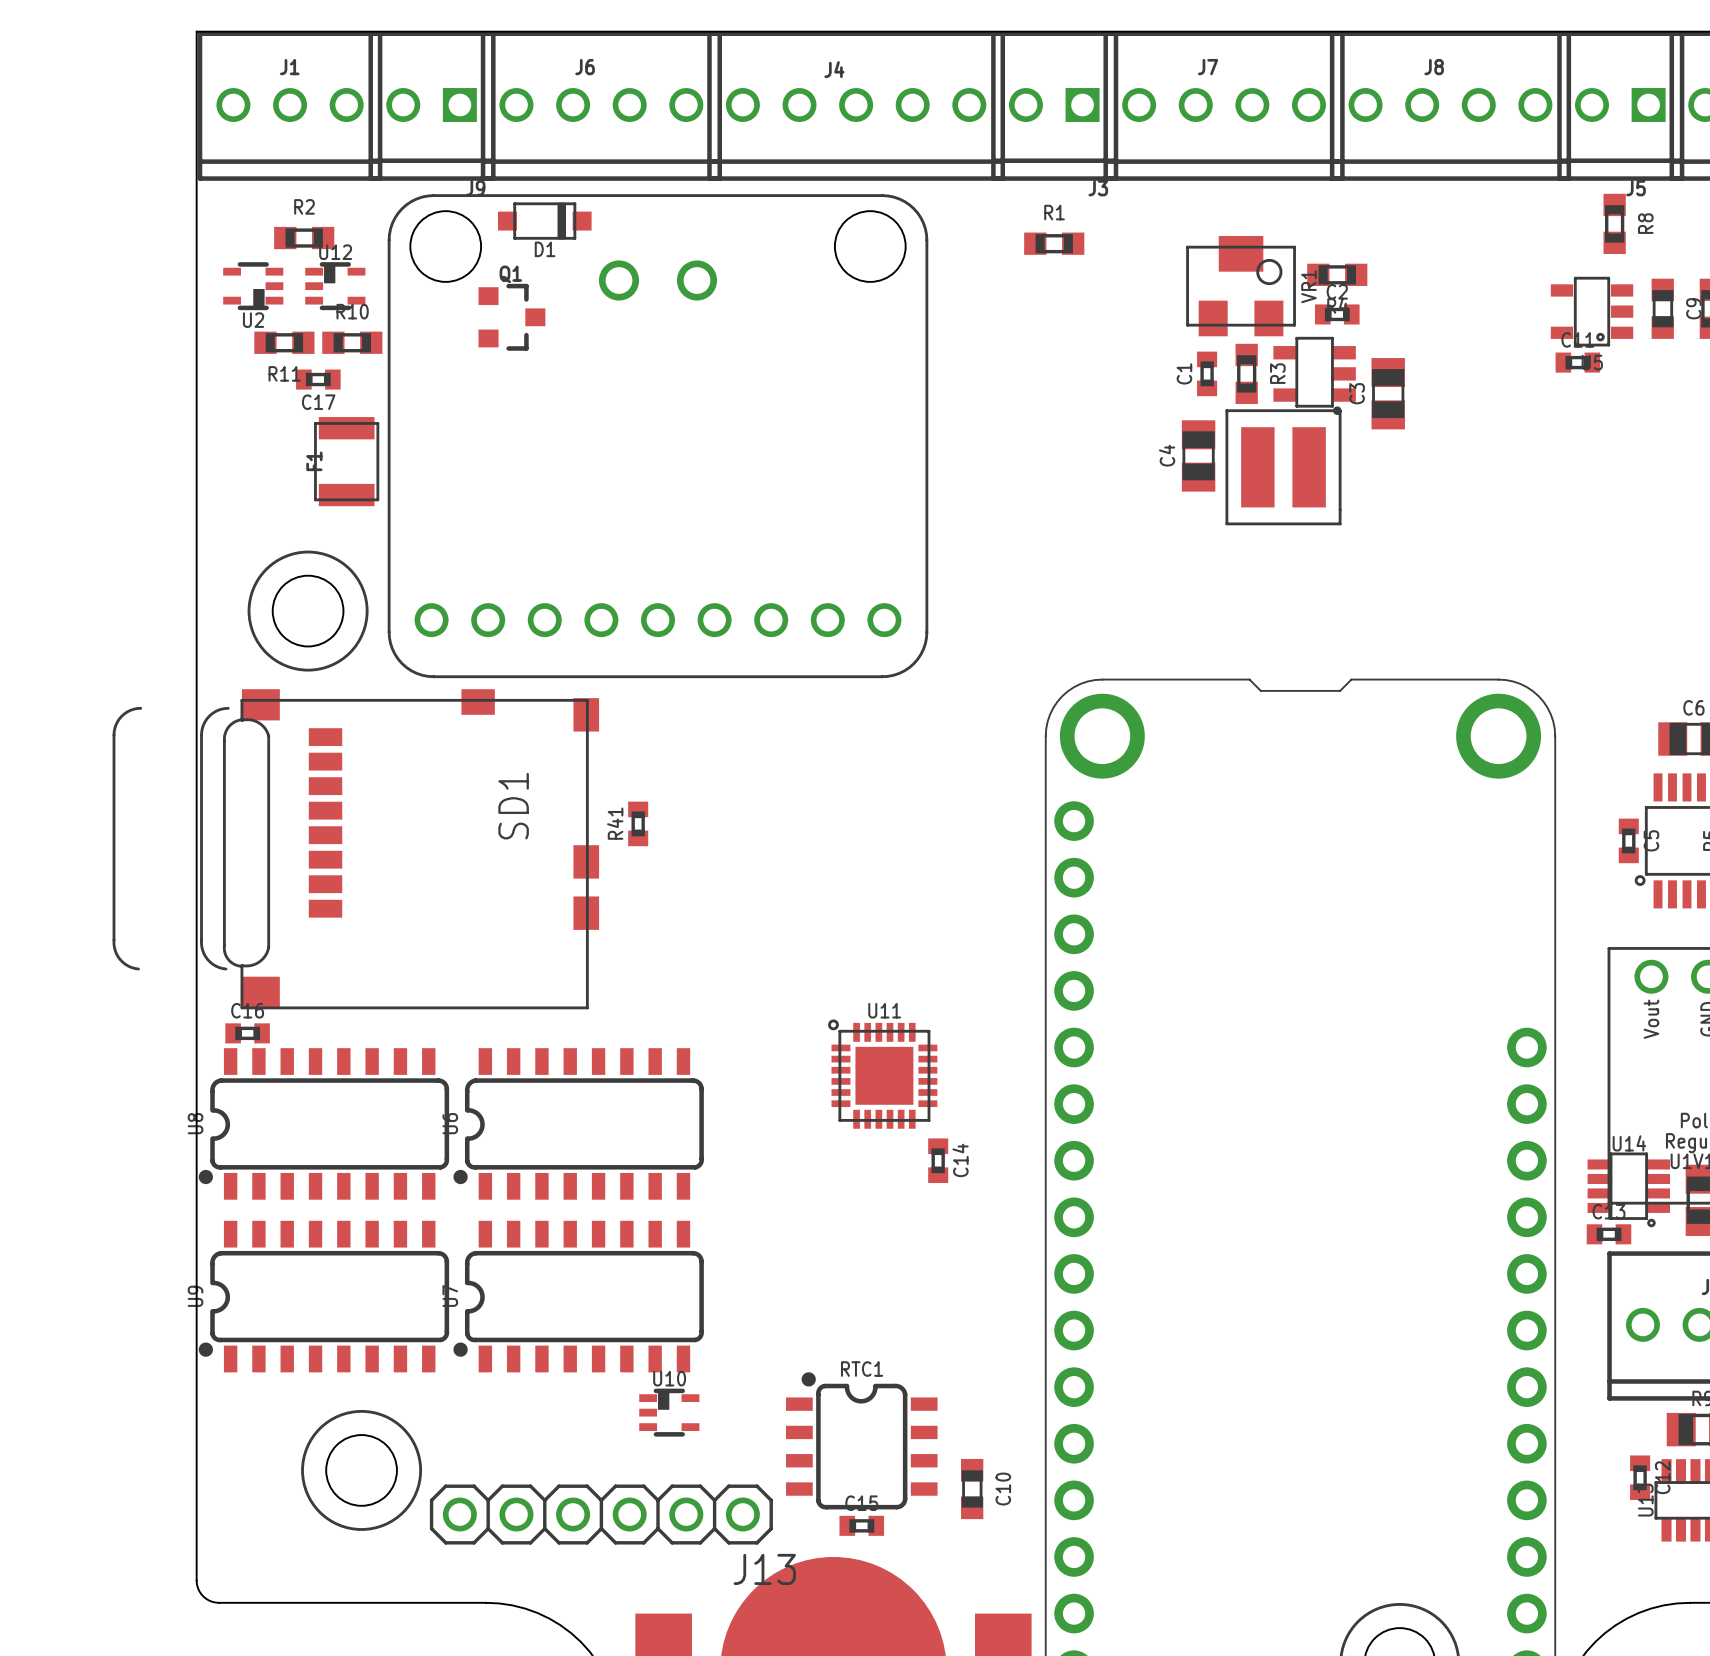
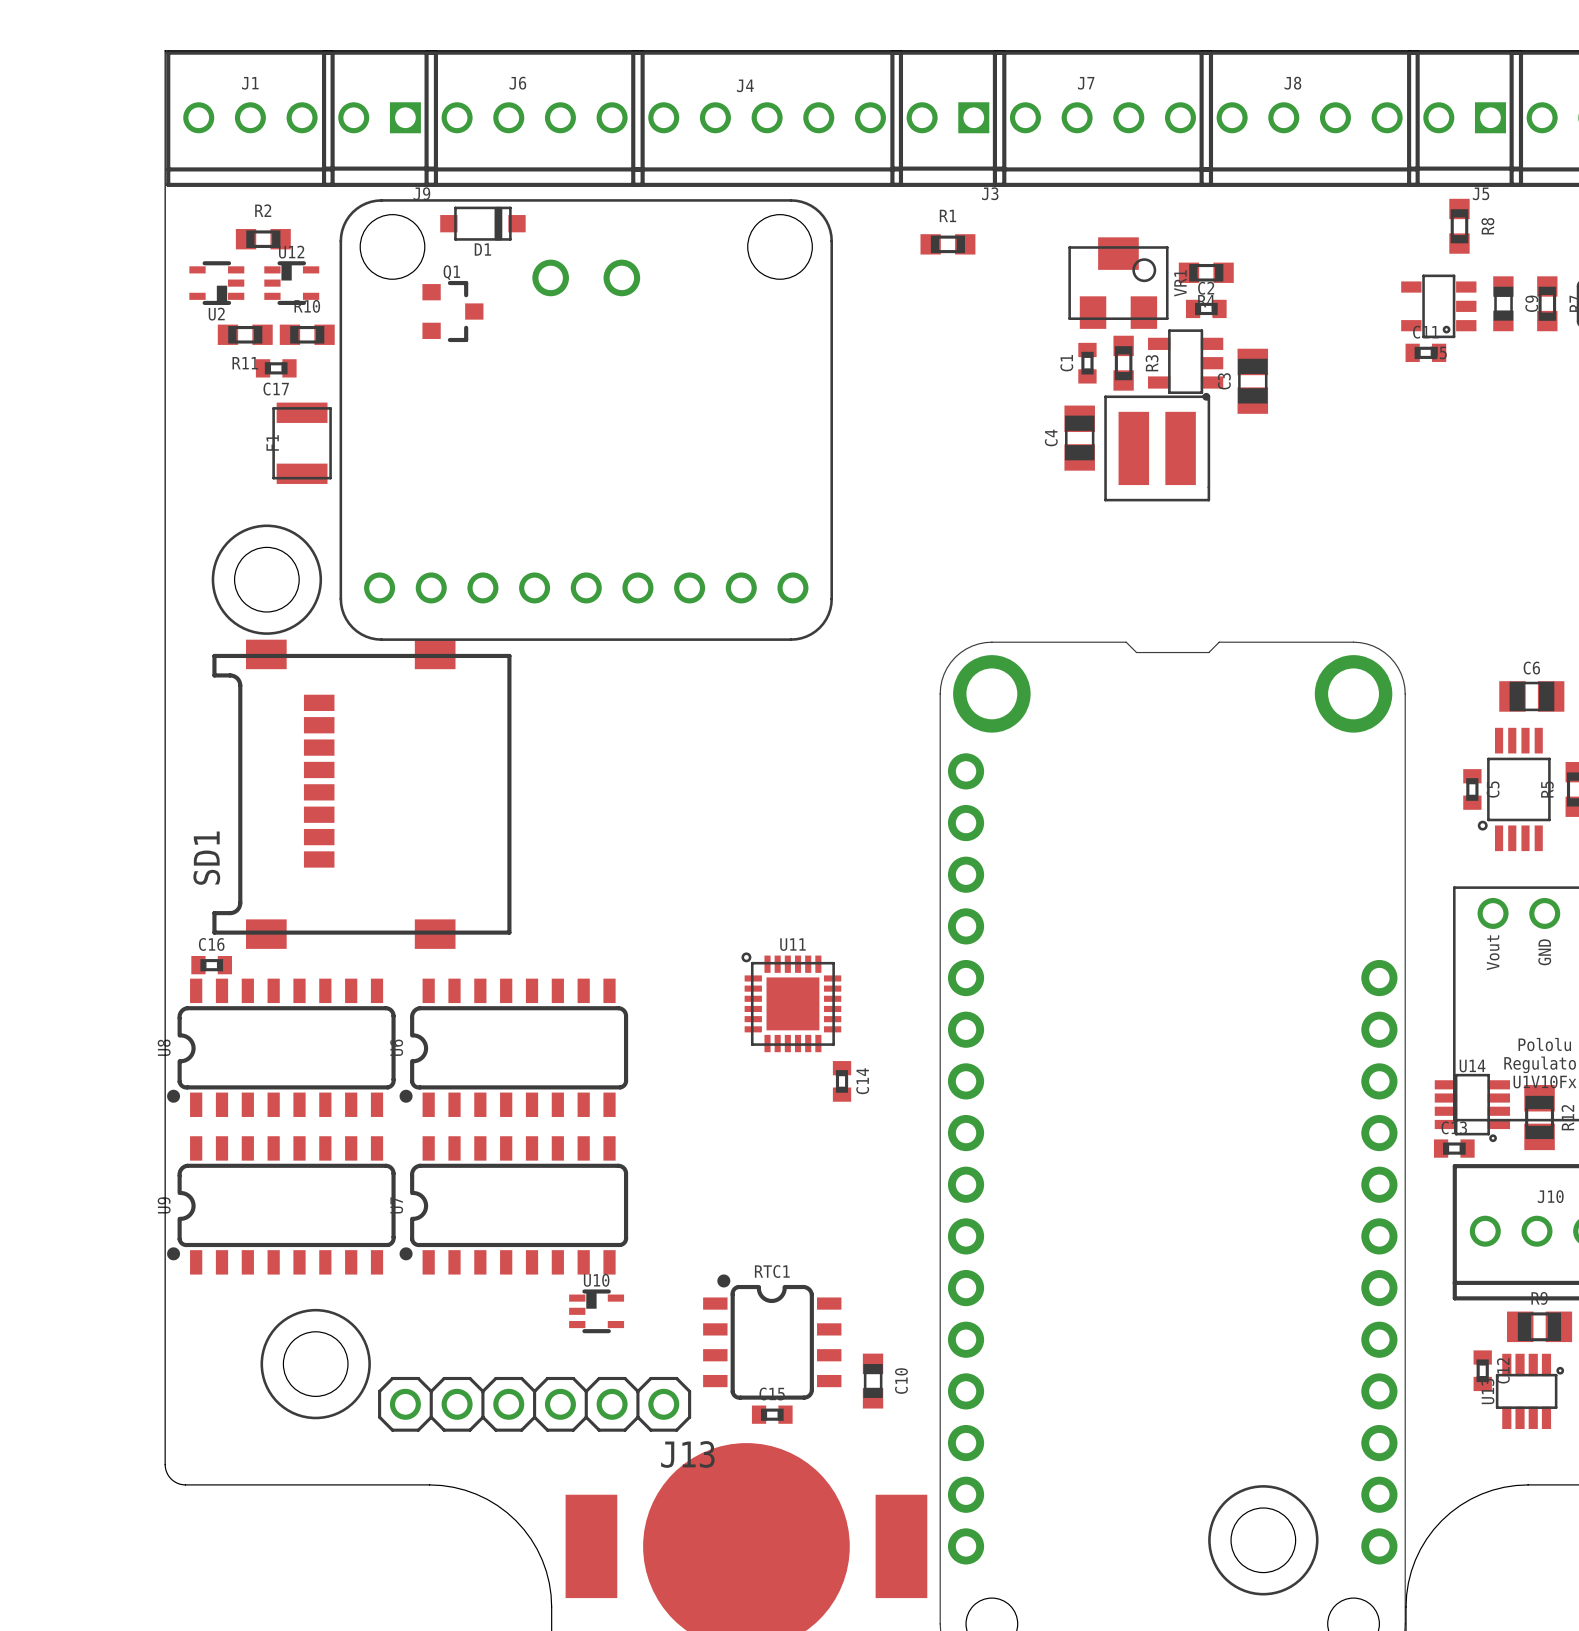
SD1 footprint: [112, 689, 600, 1010] -> [212, 639, 512, 949]
SD1 name position: SD1 (513, 806) -> SD1 (206, 858)
R41: (638, 823) -> none

